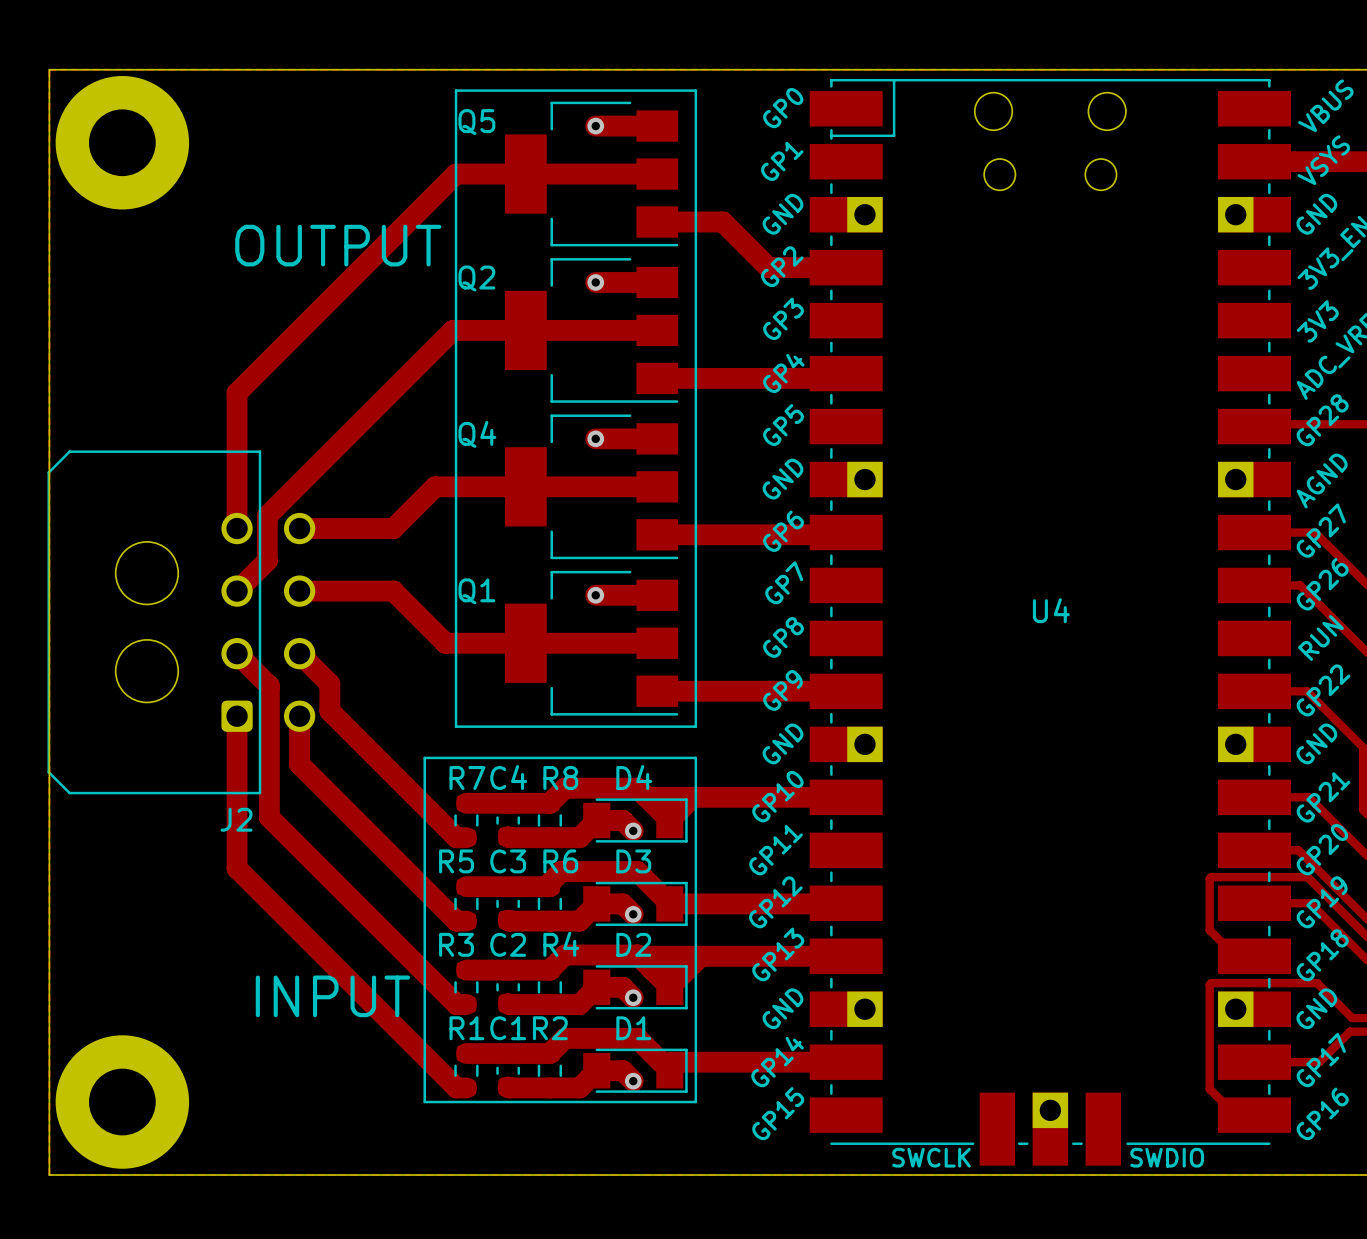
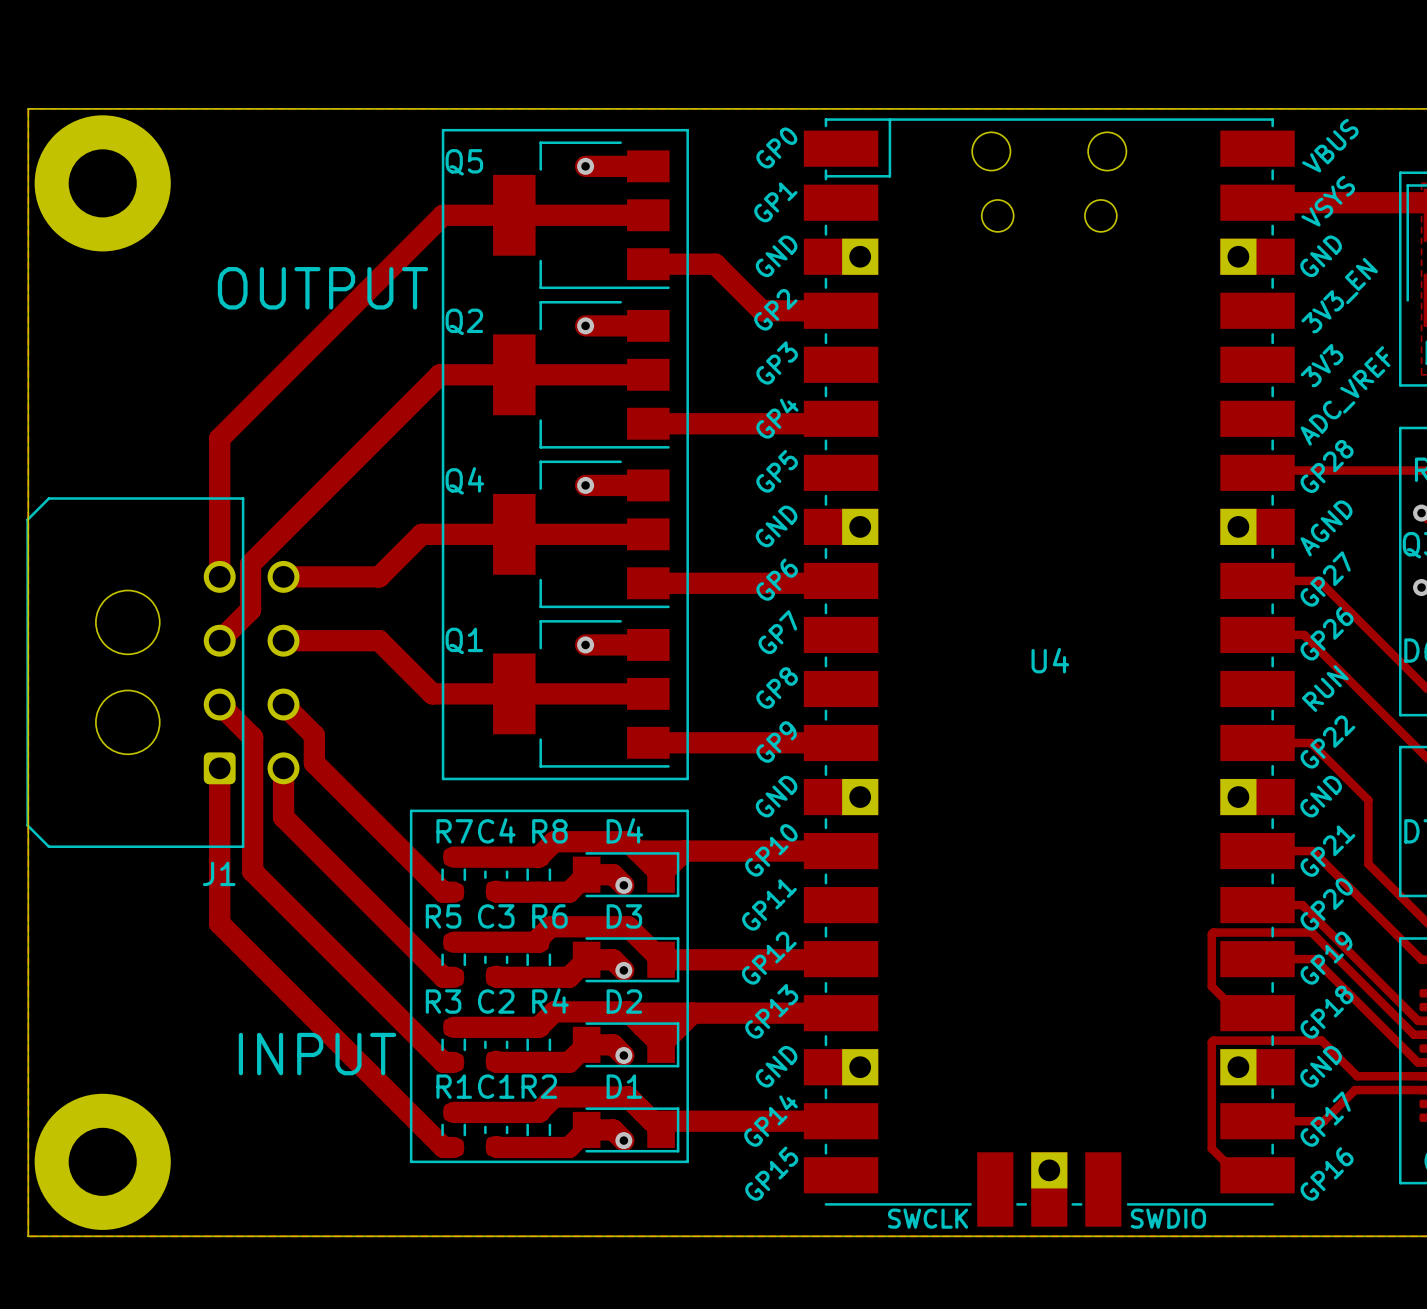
J2 name: J2 (236, 819) -> J1 (219, 873)

